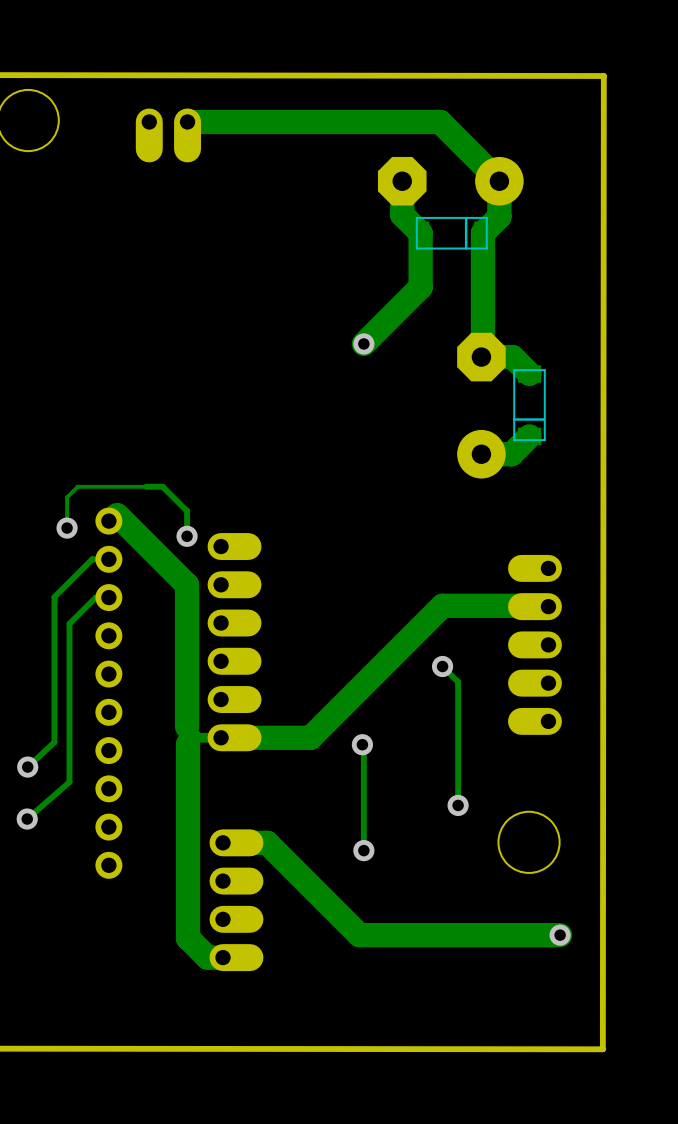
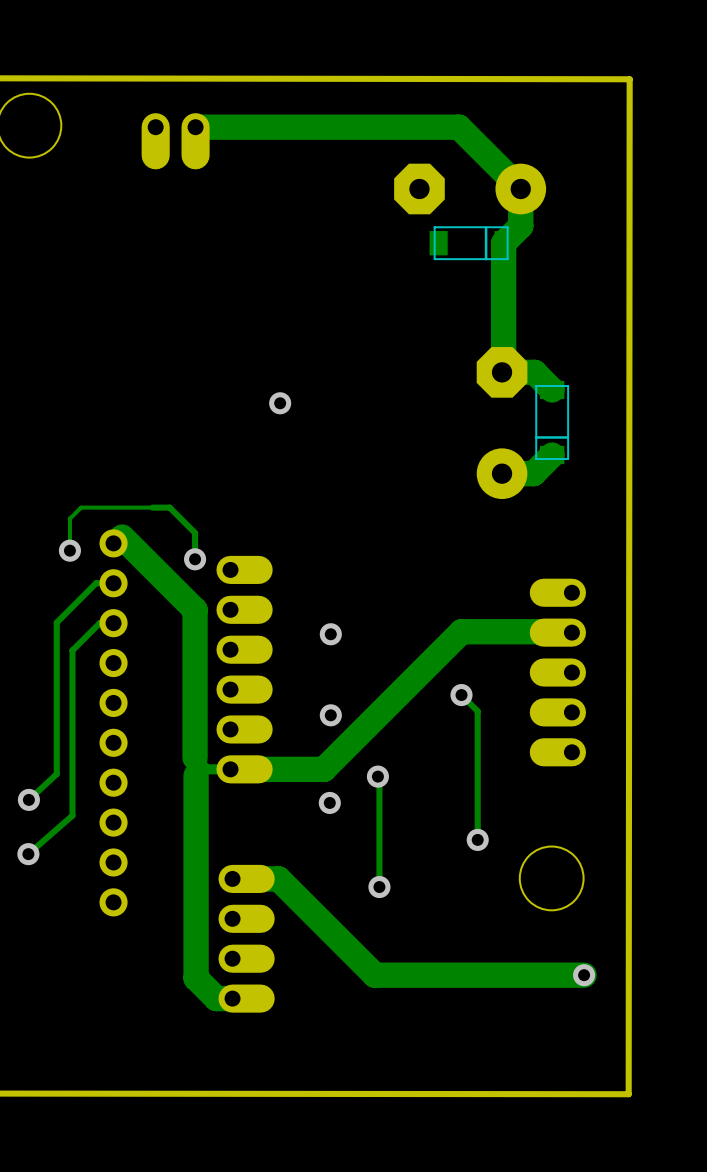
track: (402, 181) (402, 214) (420, 233) (420, 287) (363, 343) -> none
via position: (363, 343) -> (280, 403)
via: none -> (330, 634)
via: none -> (330, 715)
via: none -> (329, 802)

